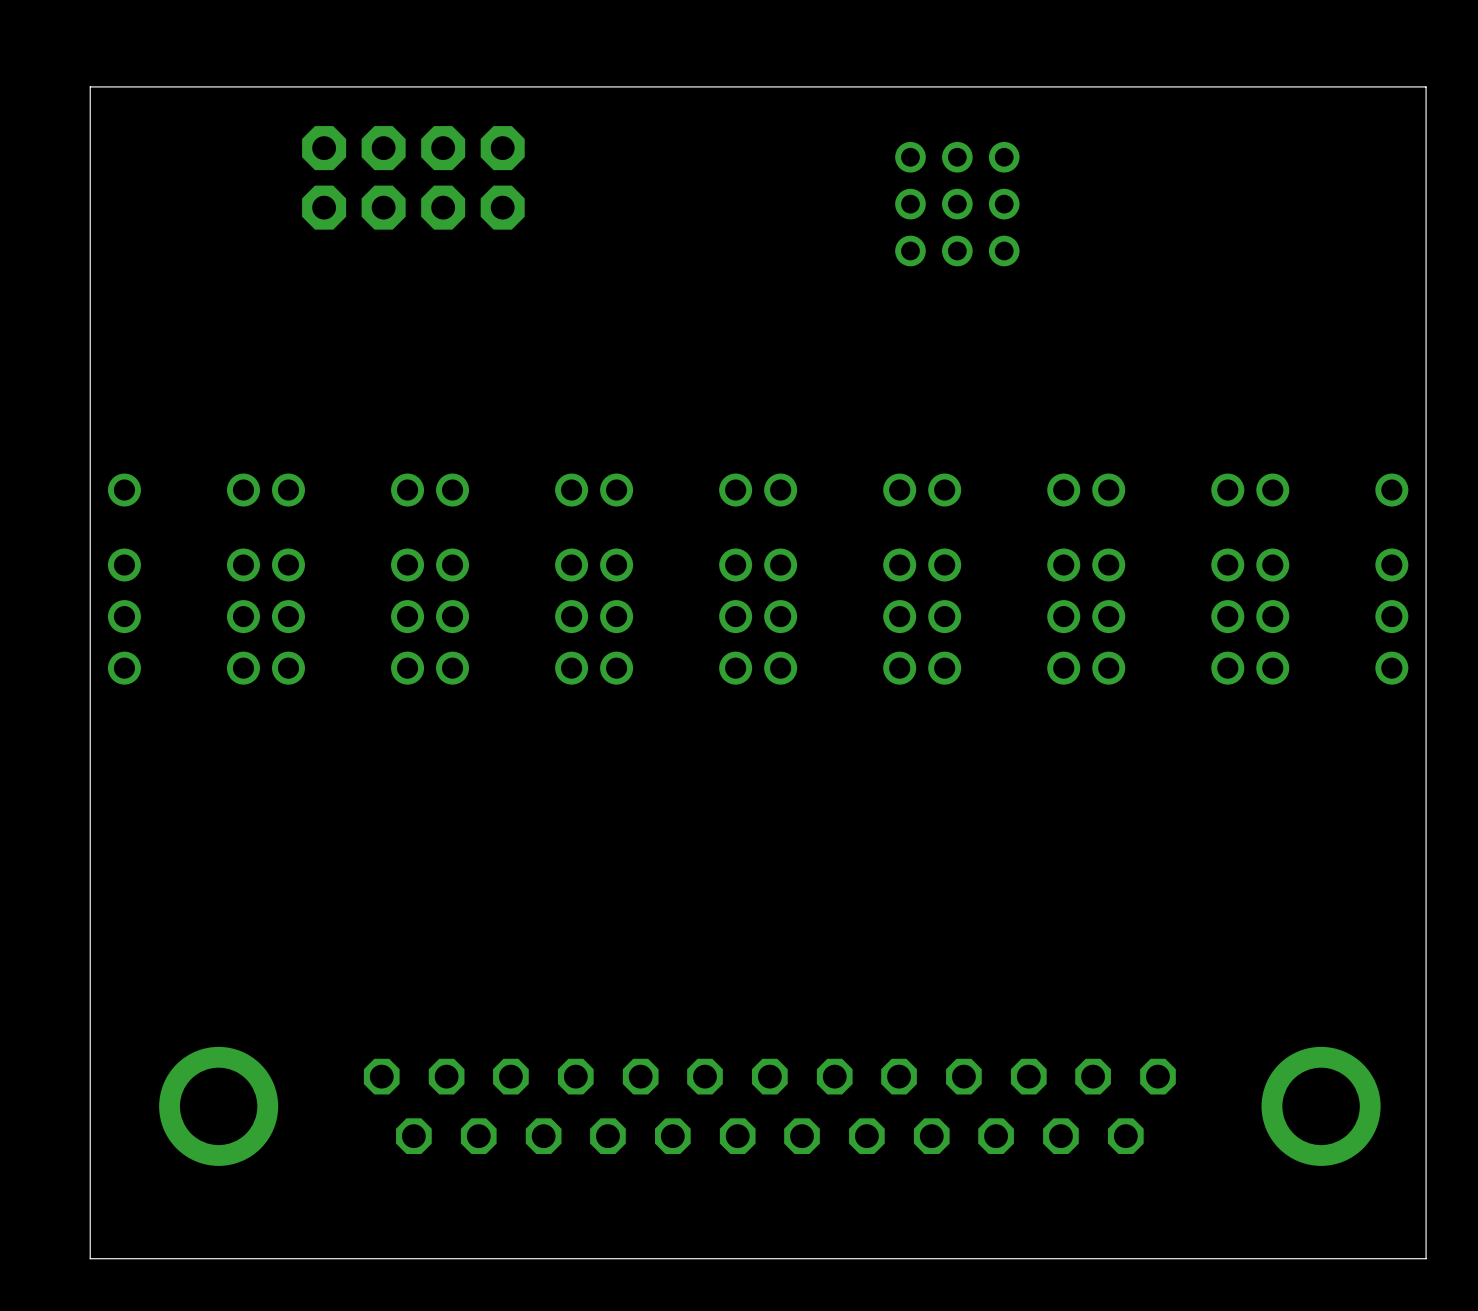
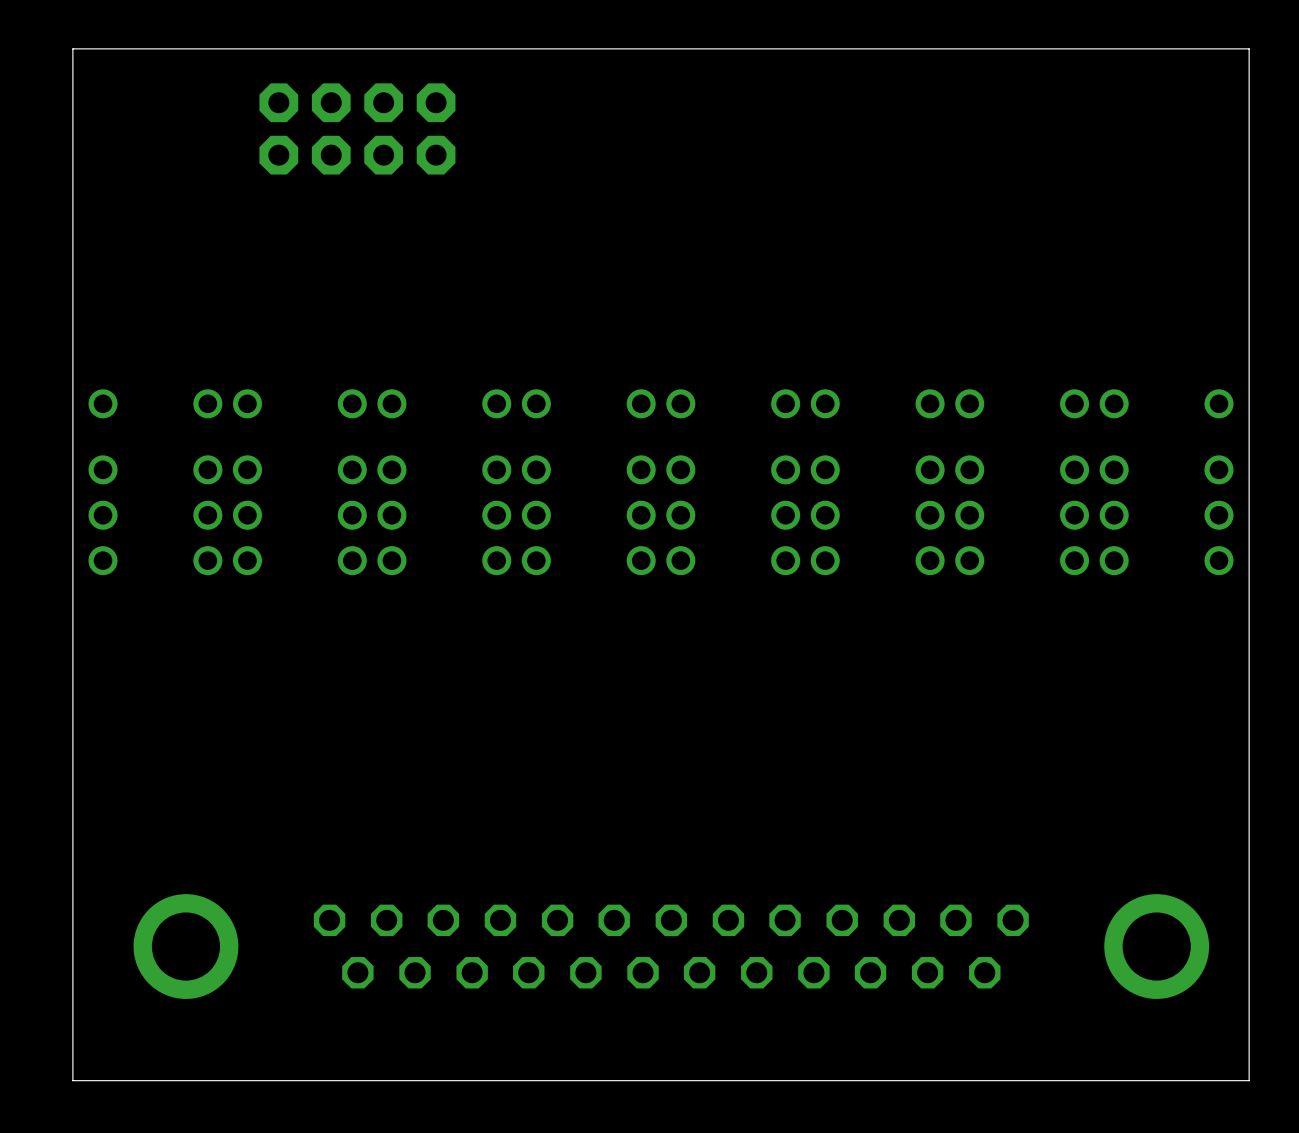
part: (957, 204) -> none

